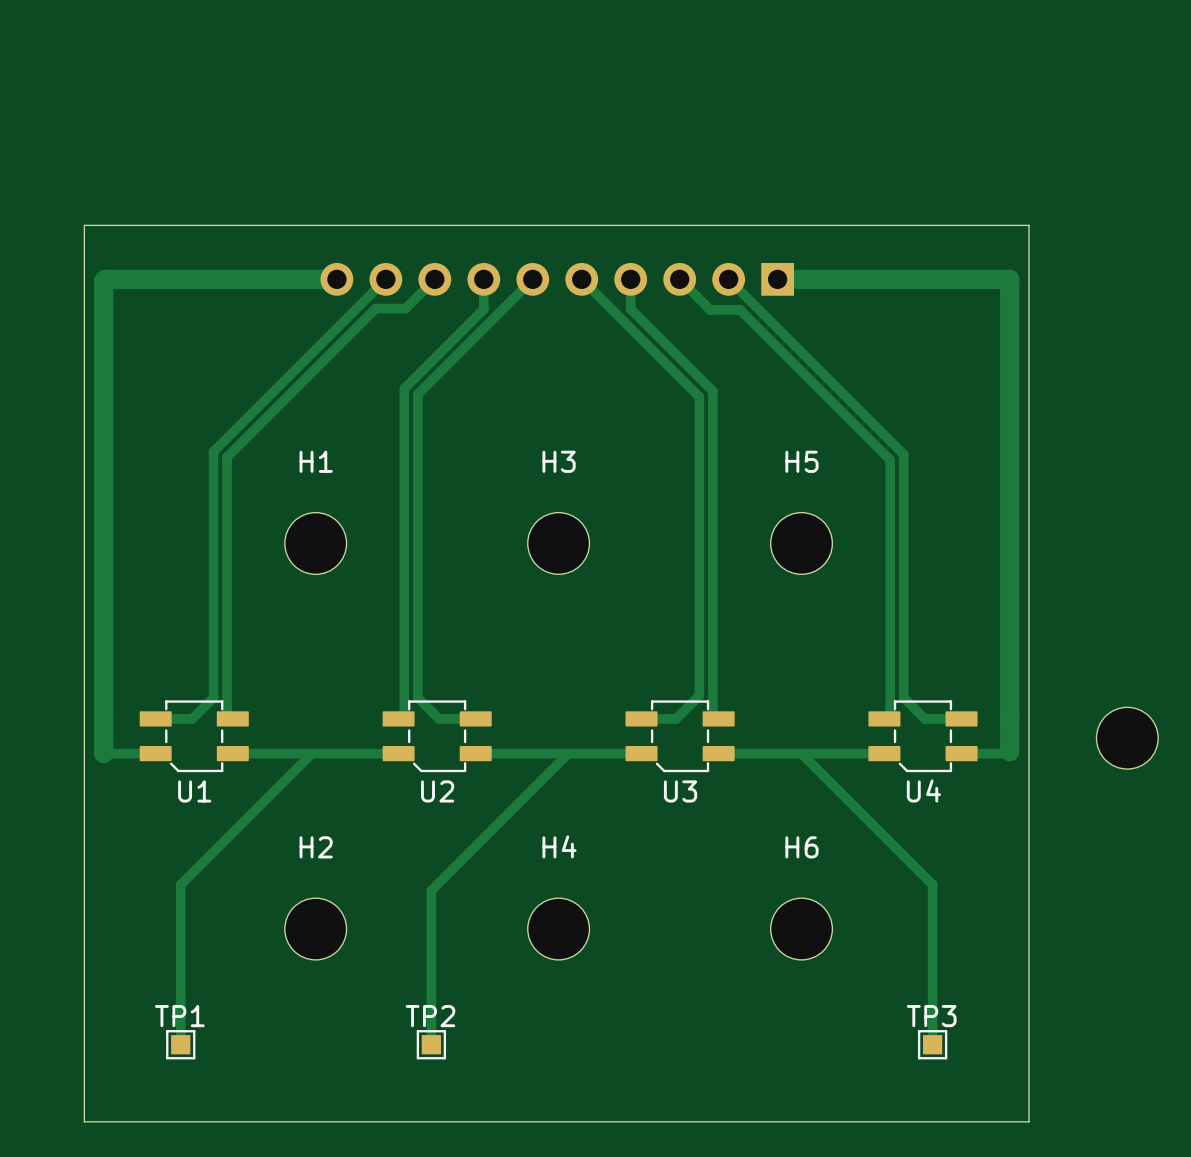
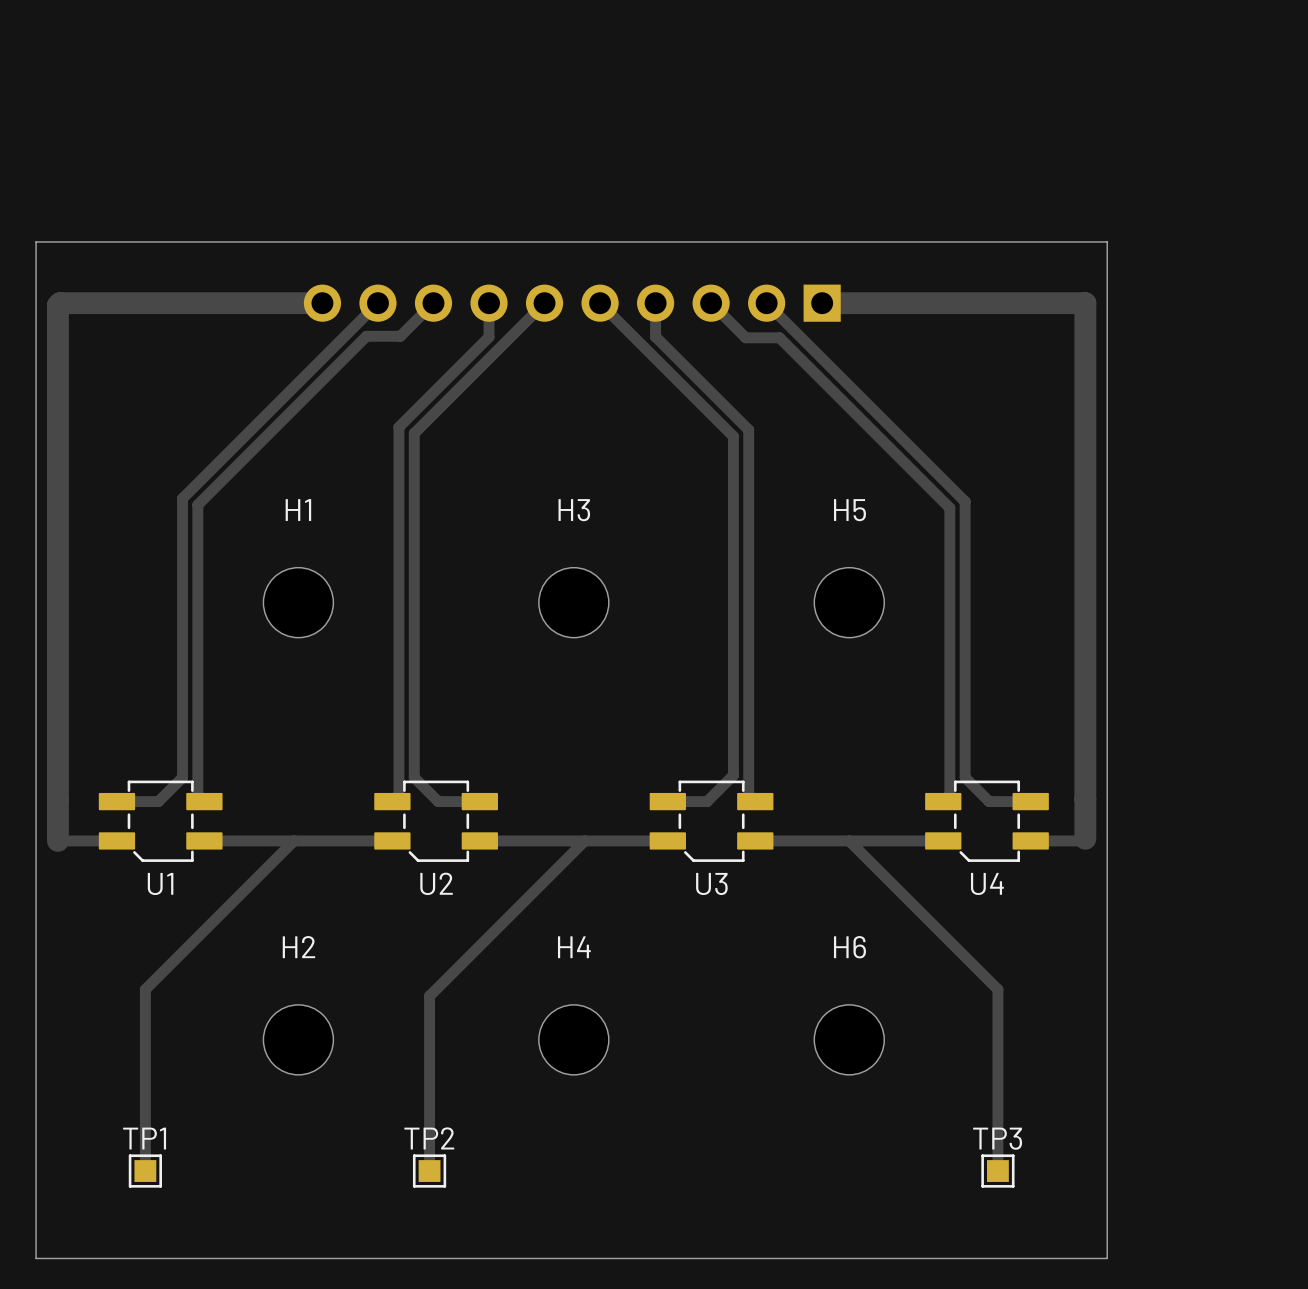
part: (1127, 738) -> none

